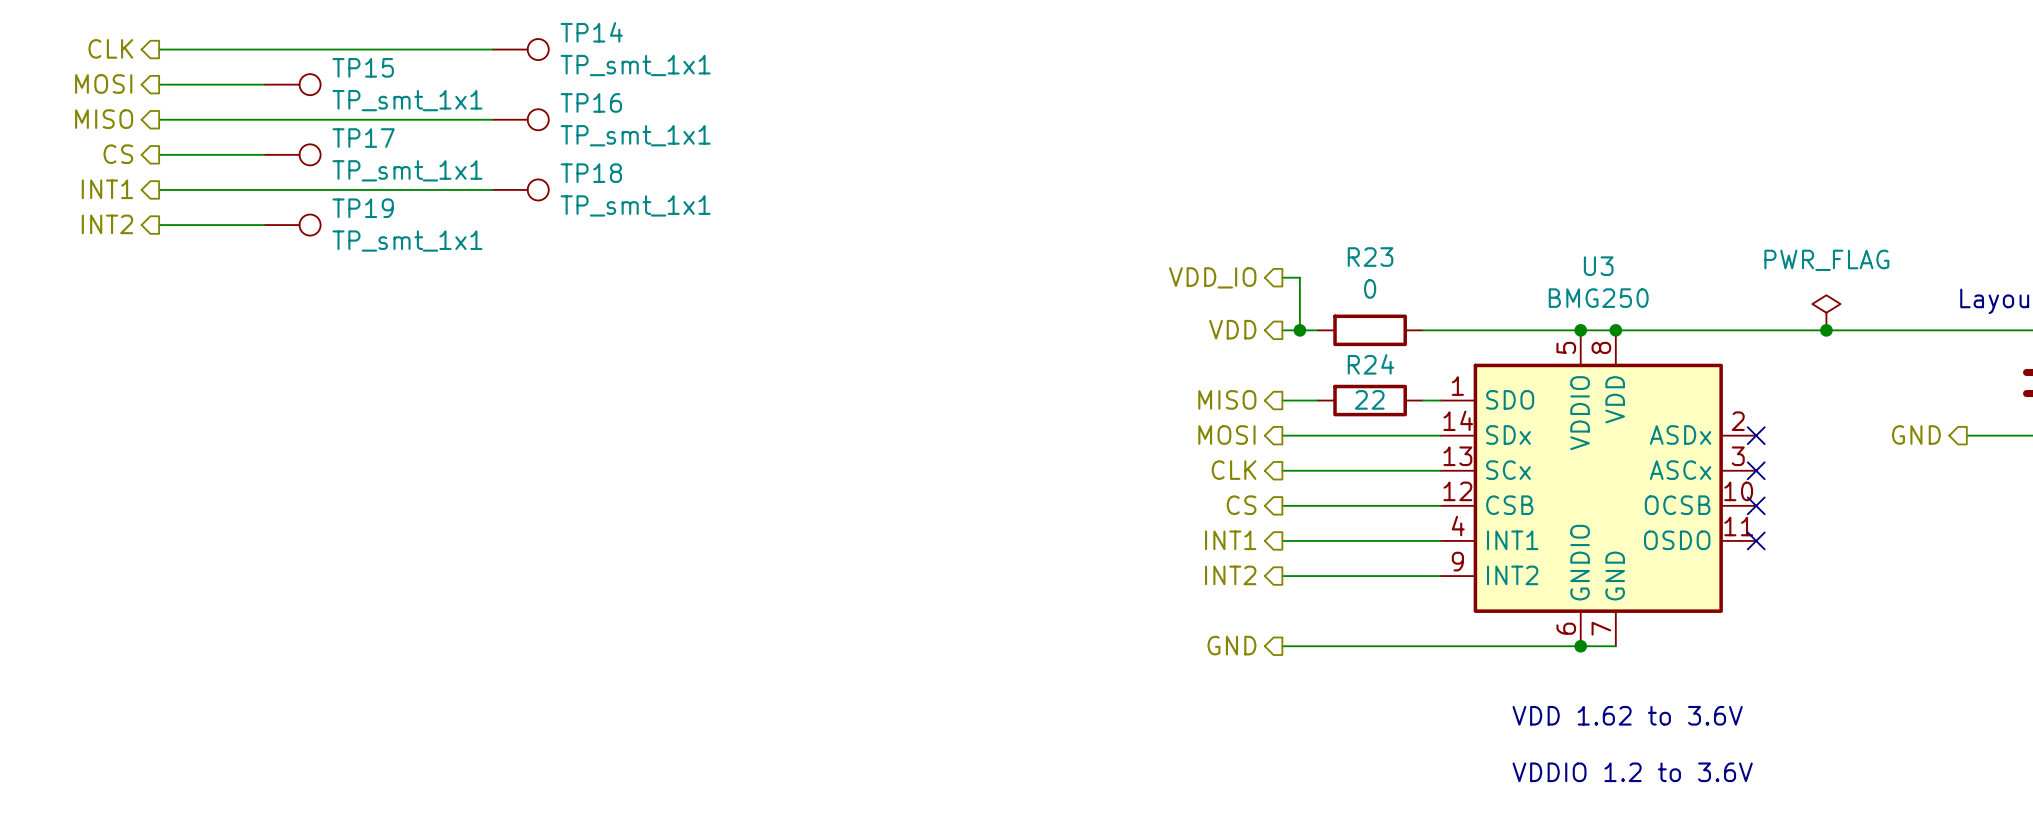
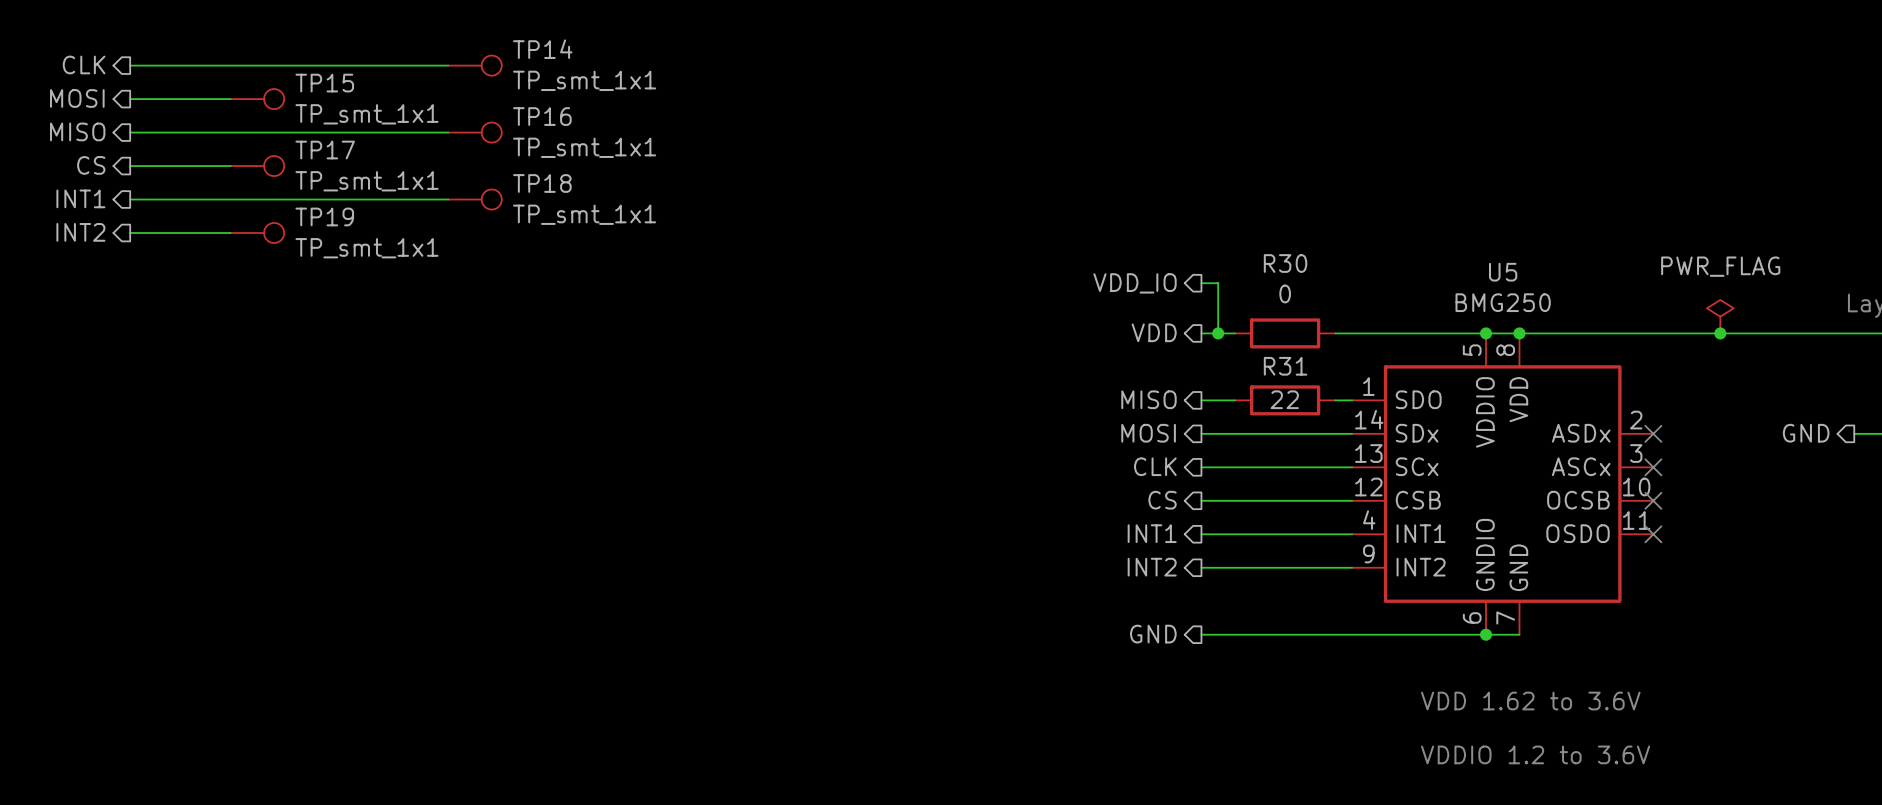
R23 name: R23 (1370, 257) -> R30 (1285, 263)
U3 name: U3 (1598, 266) -> U5 (1503, 272)
R24 name: R24 (1370, 364) -> R31 (1285, 366)

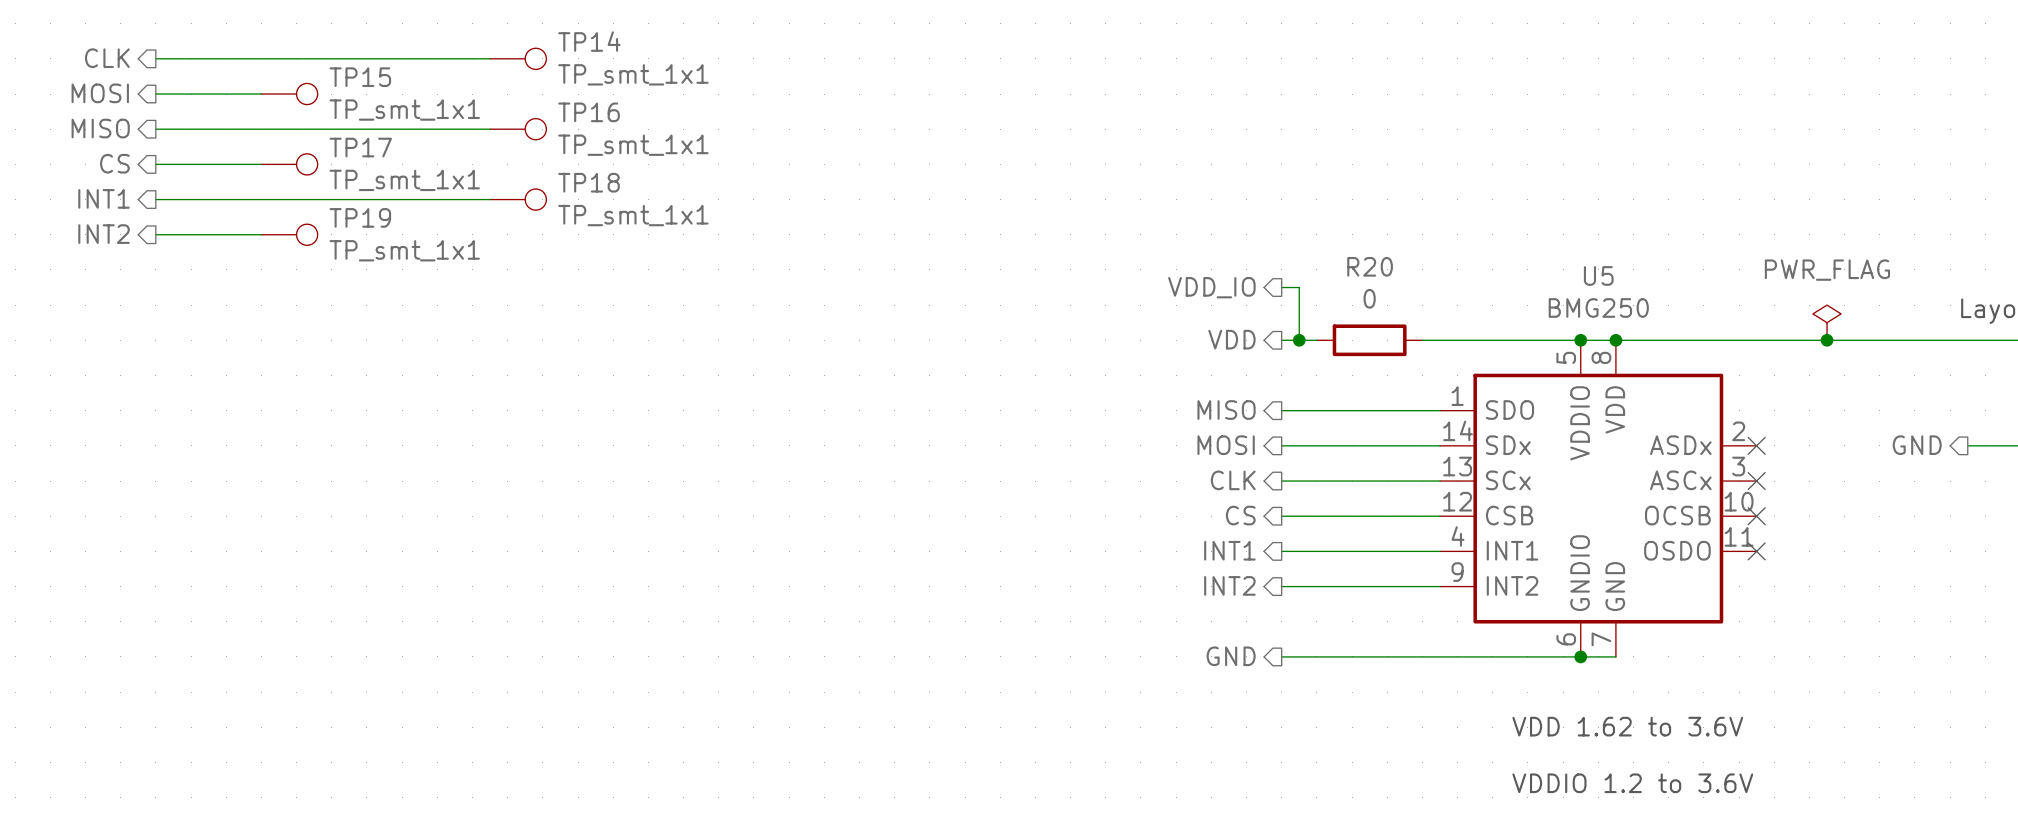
R30 name: R30 (1285, 263) -> R20 (1370, 266)
wire: none -> (1316, 410) (1422, 410)
R31: 22 (1285, 400) -> none

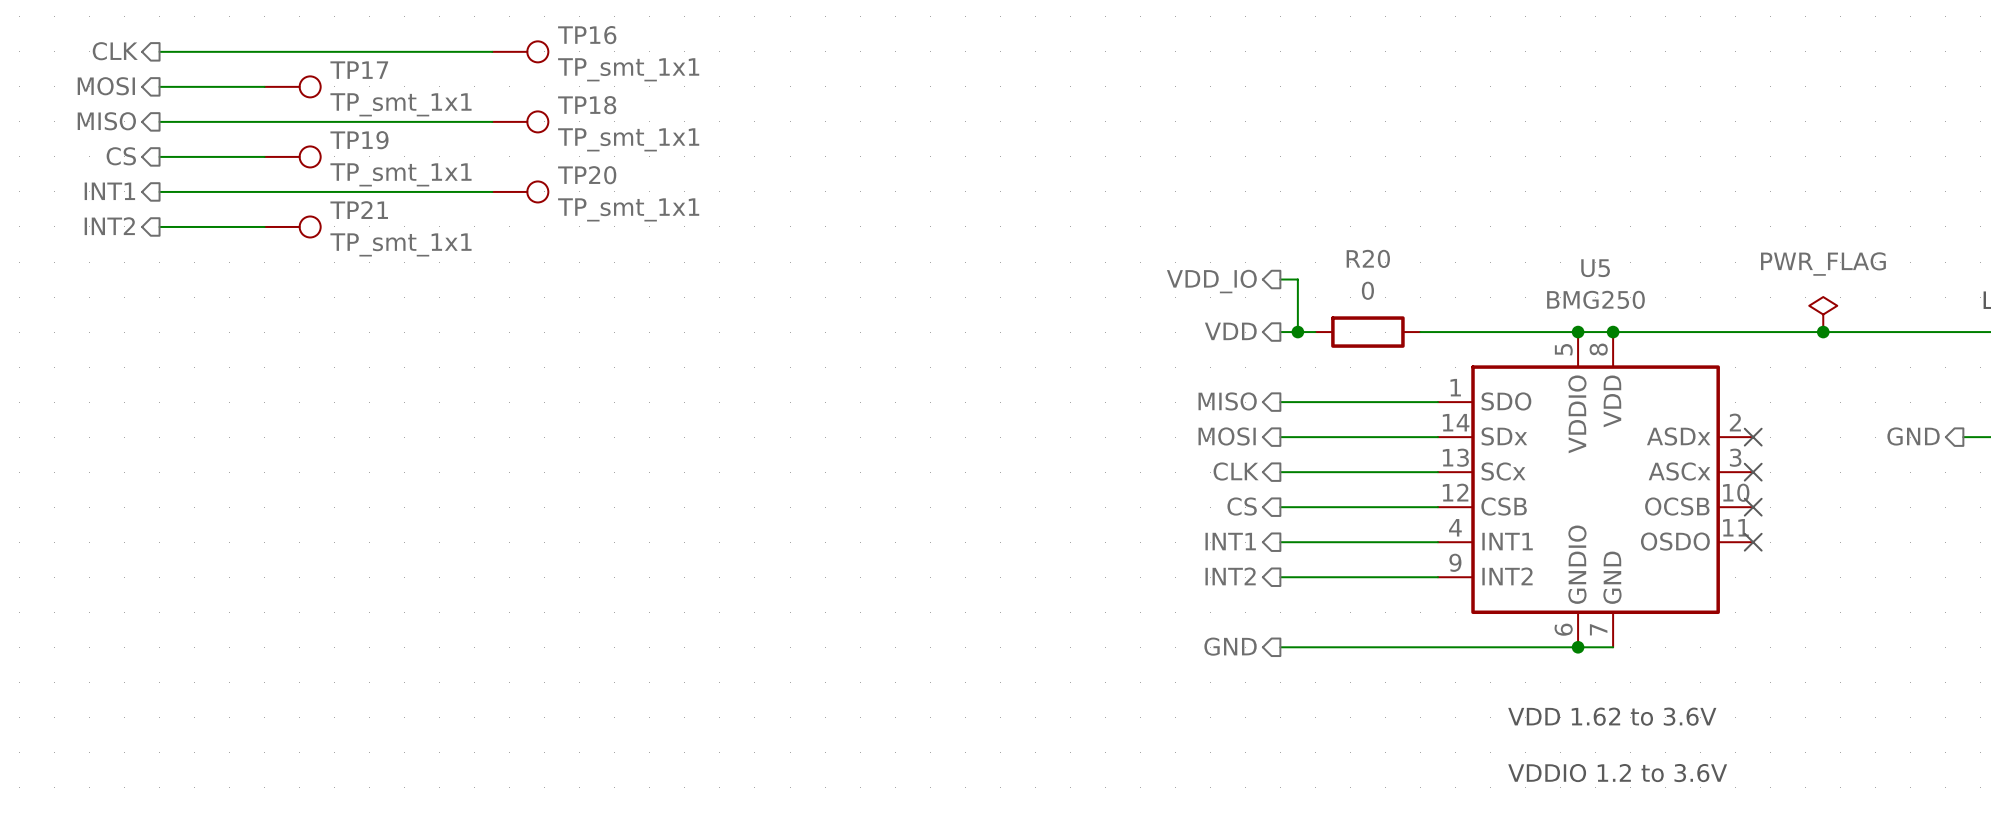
TP14 name: TP14 (589, 41) -> TP16 (587, 35)
TP15 name: TP15 (360, 77) -> TP17 (359, 70)
TP16 name: TP16 (589, 112) -> TP18 (587, 105)
TP17 name: TP17 (360, 147) -> TP19 (359, 140)
TP18 name: TP18 (589, 182) -> TP20 (587, 175)
TP19 name: TP19 (360, 217) -> TP21 (359, 210)

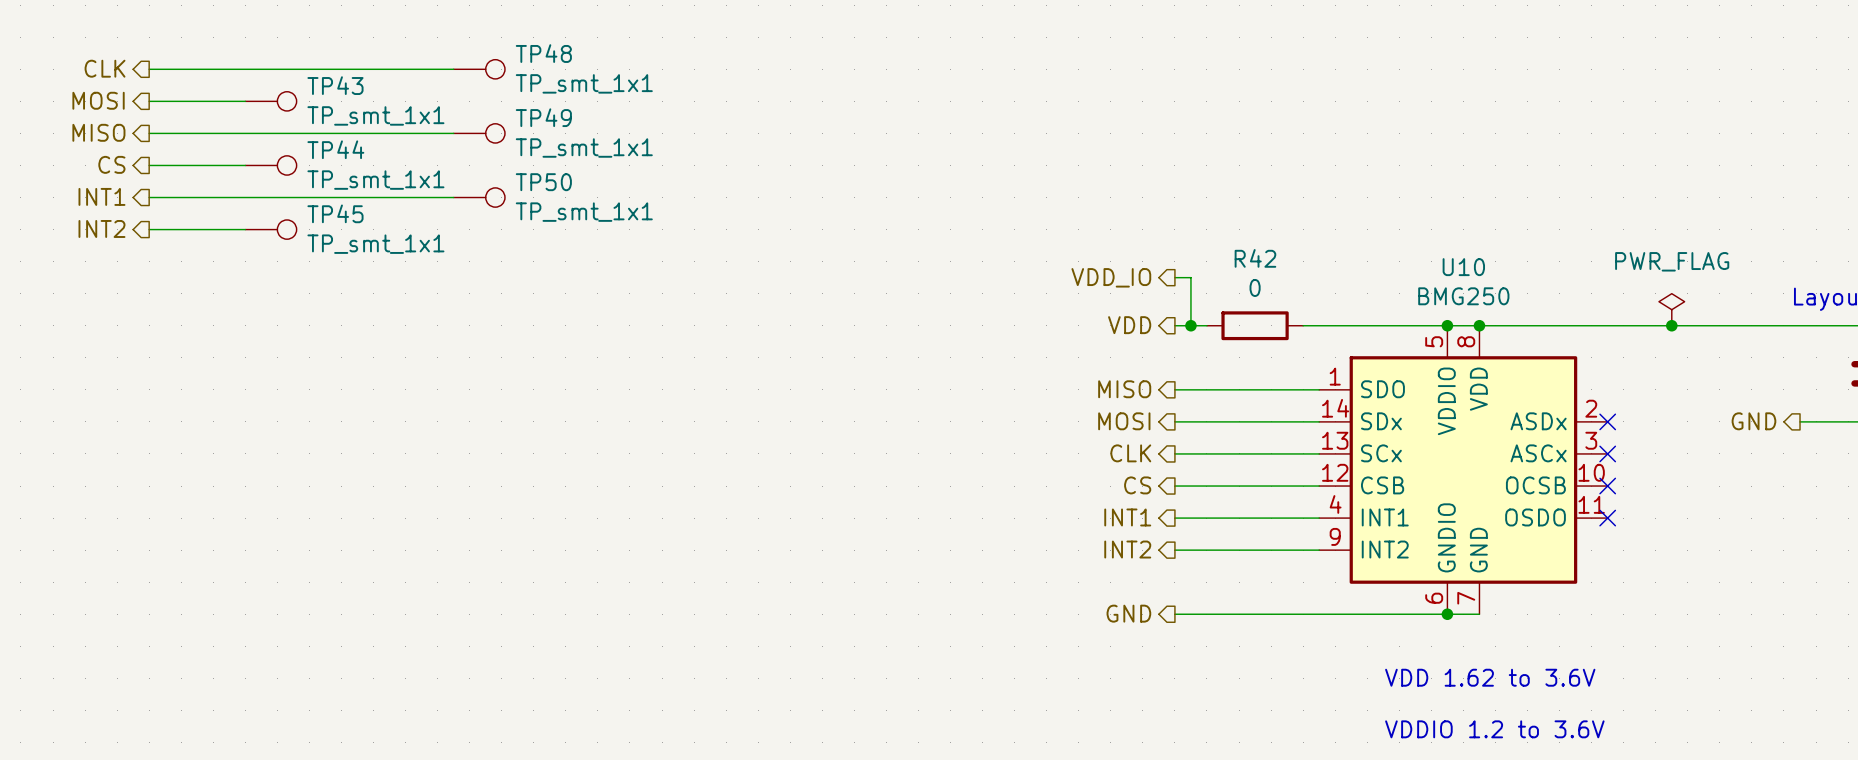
TP16 name: TP16 (587, 35) -> TP48 (543, 53)
TP17 name: TP17 (359, 70) -> TP43 (335, 85)
TP18 name: TP18 (587, 105) -> TP49 (543, 117)
TP19 name: TP19 (359, 140) -> TP44 (335, 149)
TP20 name: TP20 (587, 175) -> TP50 (543, 182)
TP21 name: TP21 (359, 210) -> TP45 (335, 213)
R20 name: R20 (1368, 258) -> R42 (1255, 258)
U5 name: U5 (1595, 268) -> U10 (1463, 267)

